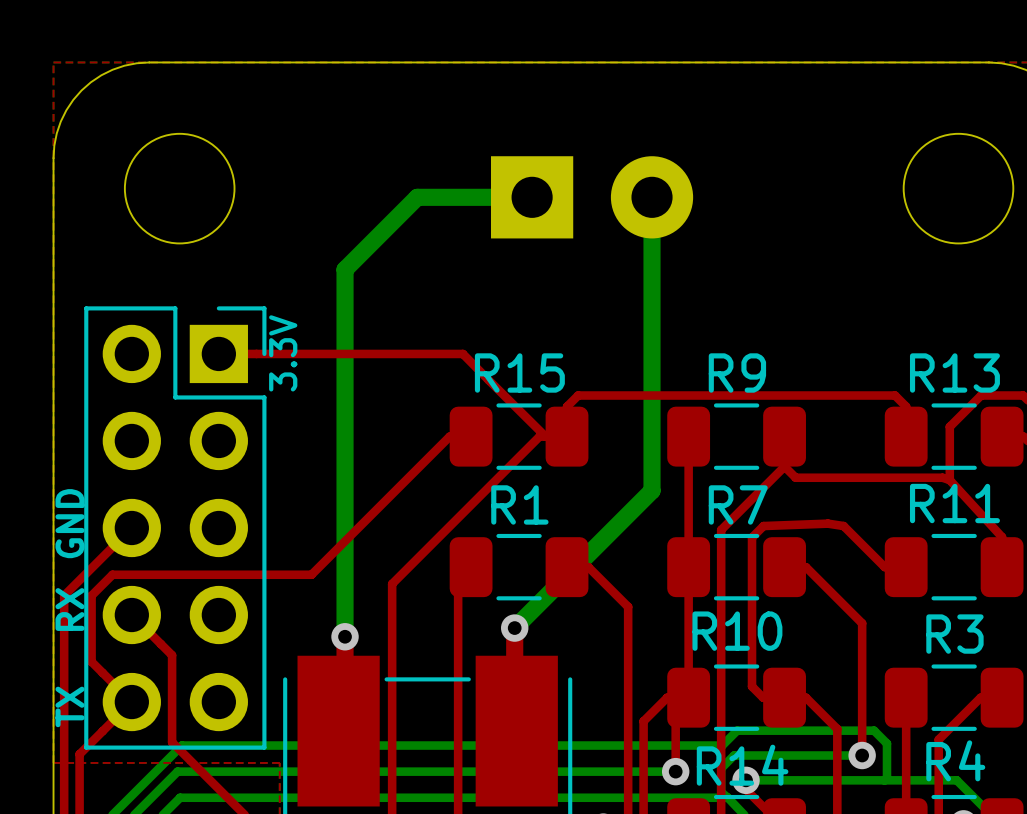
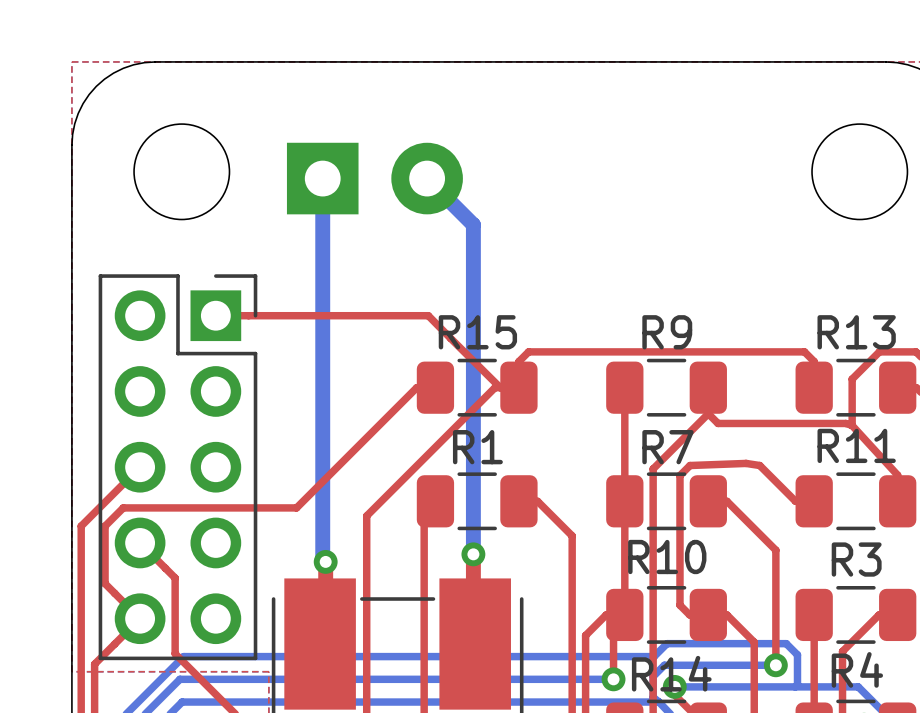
bottom track: (532, 197) (417, 197) (345, 269) (345, 636) -> (322, 178) (322, 558) (325, 561)
part position: (592, 197) -> (374, 178)
bottom track: (652, 197) (652, 490) (514, 628) -> (427, 178) (473, 224) (473, 554)
text: 3.3V (283, 353) -> none
text: GND (70, 523) -> none
text: RX (70, 609) -> none
text: TX (70, 706) -> none

